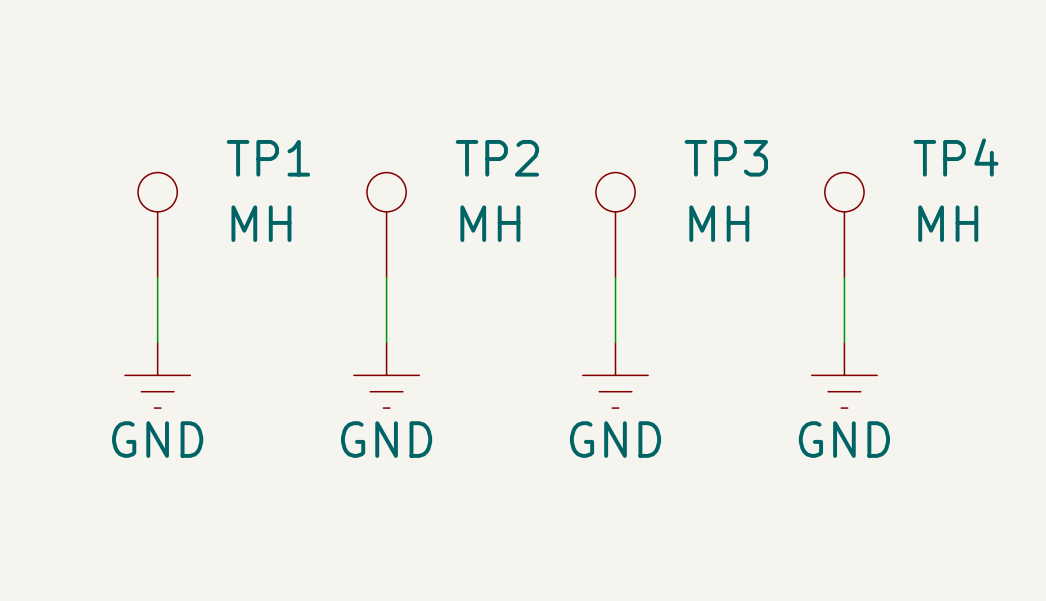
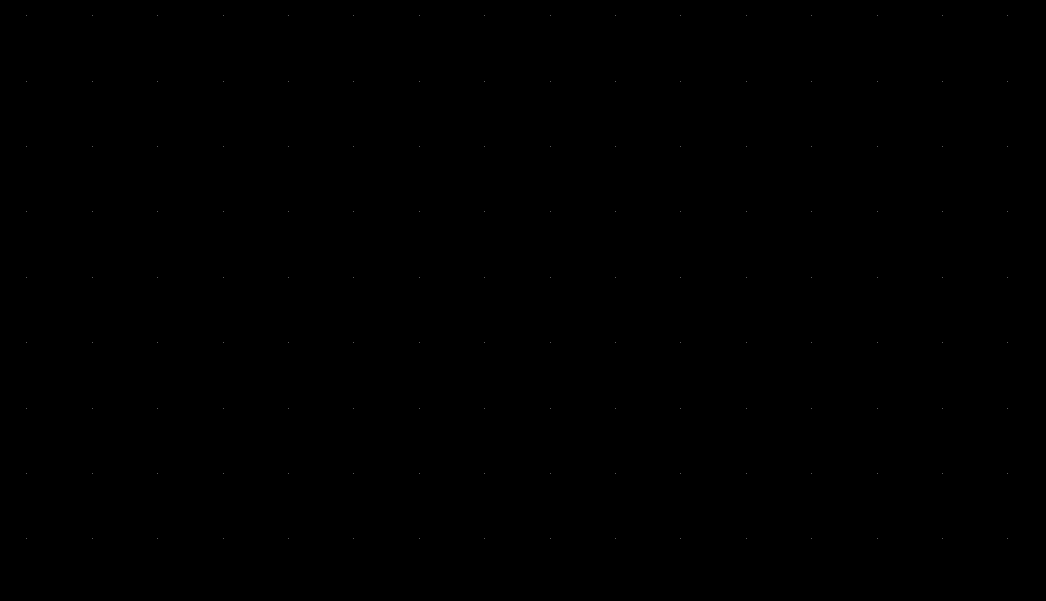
TP1: MH (157, 224) -> none
TP2: MH (386, 224) -> none
TP3: MH (615, 224) -> none
TP4: MH (844, 224) -> none
wire: (157, 277) (157, 342) -> none
wire: (386, 277) (386, 342) -> none
wire: (615, 277) (615, 342) -> none
wire: (844, 277) (844, 342) -> none
power symbol: GND (157, 375) -> none
power symbol: GND (386, 375) -> none
power symbol: GND (615, 375) -> none
power symbol: GND (844, 375) -> none

